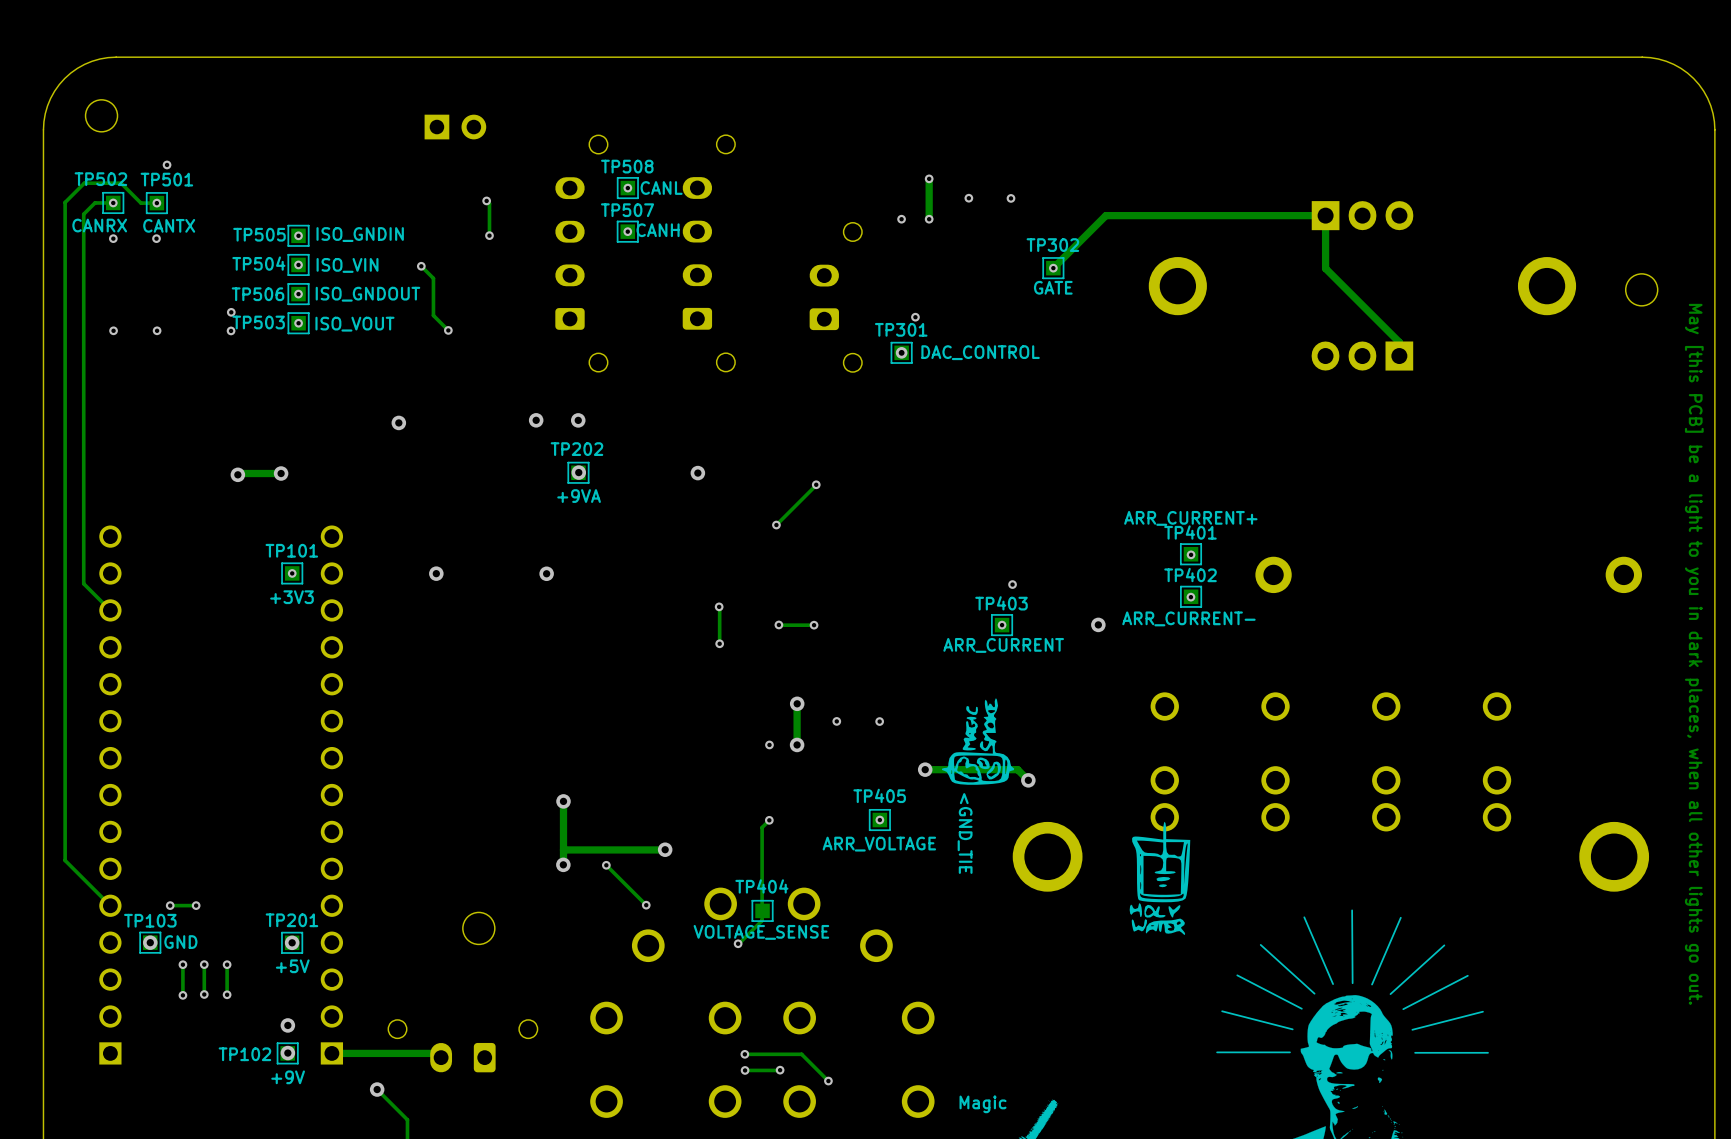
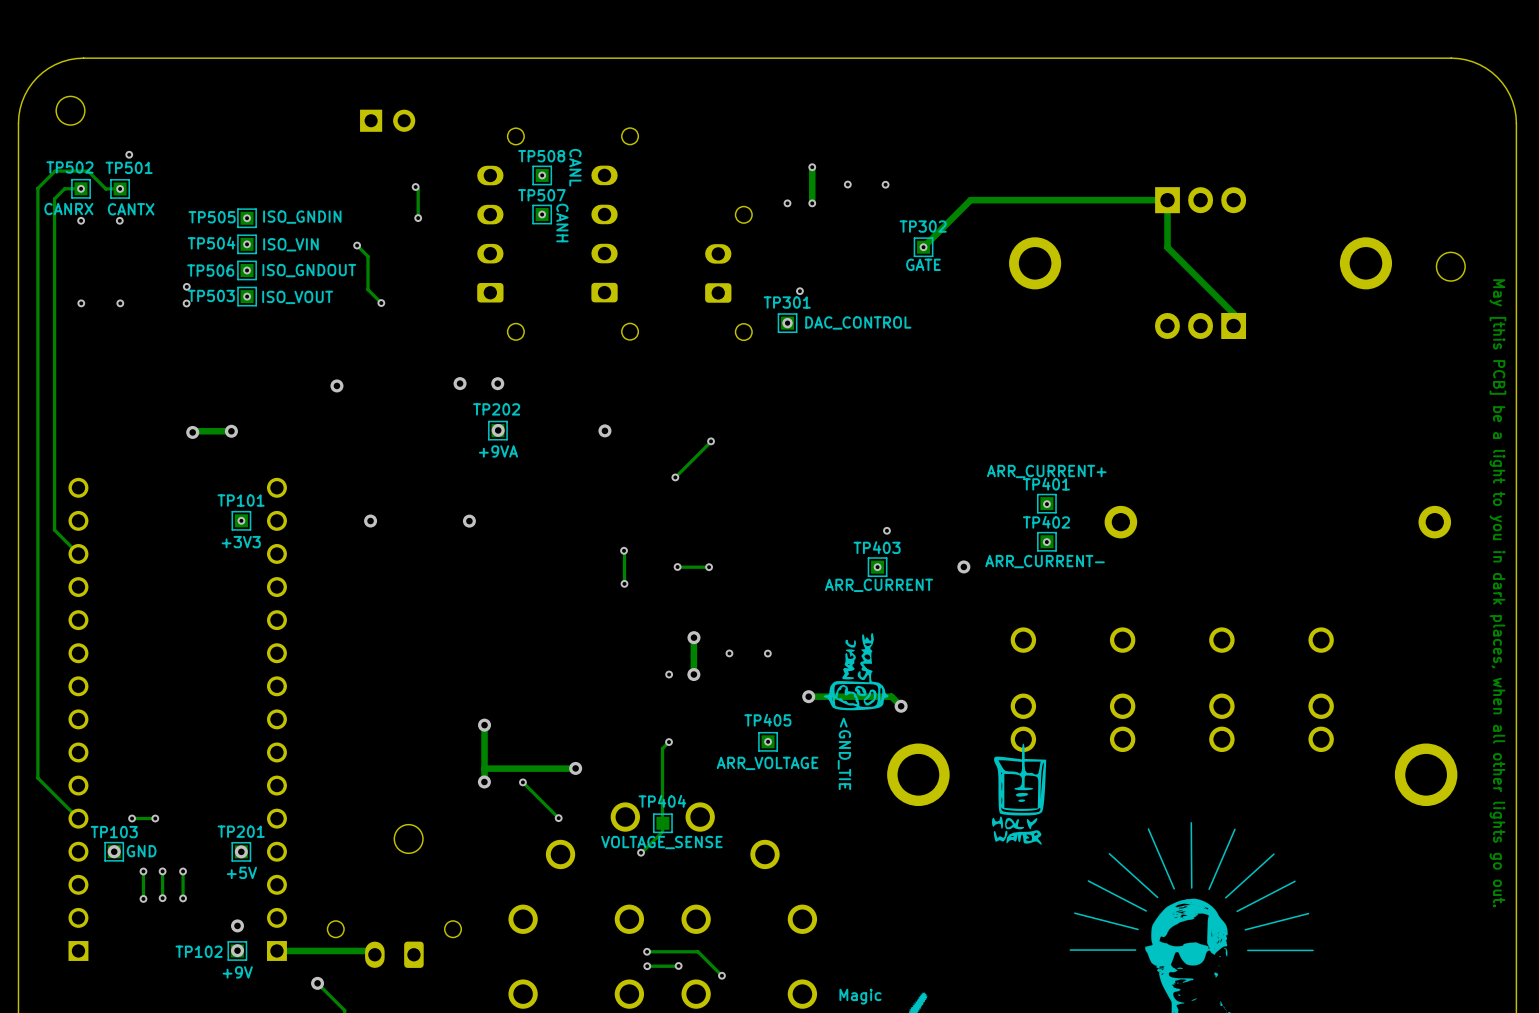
text rotation: 0° (661, 187) -> 90° clockwise (575, 167)
text rotation: 0° (658, 230) -> 90° clockwise (562, 222)

